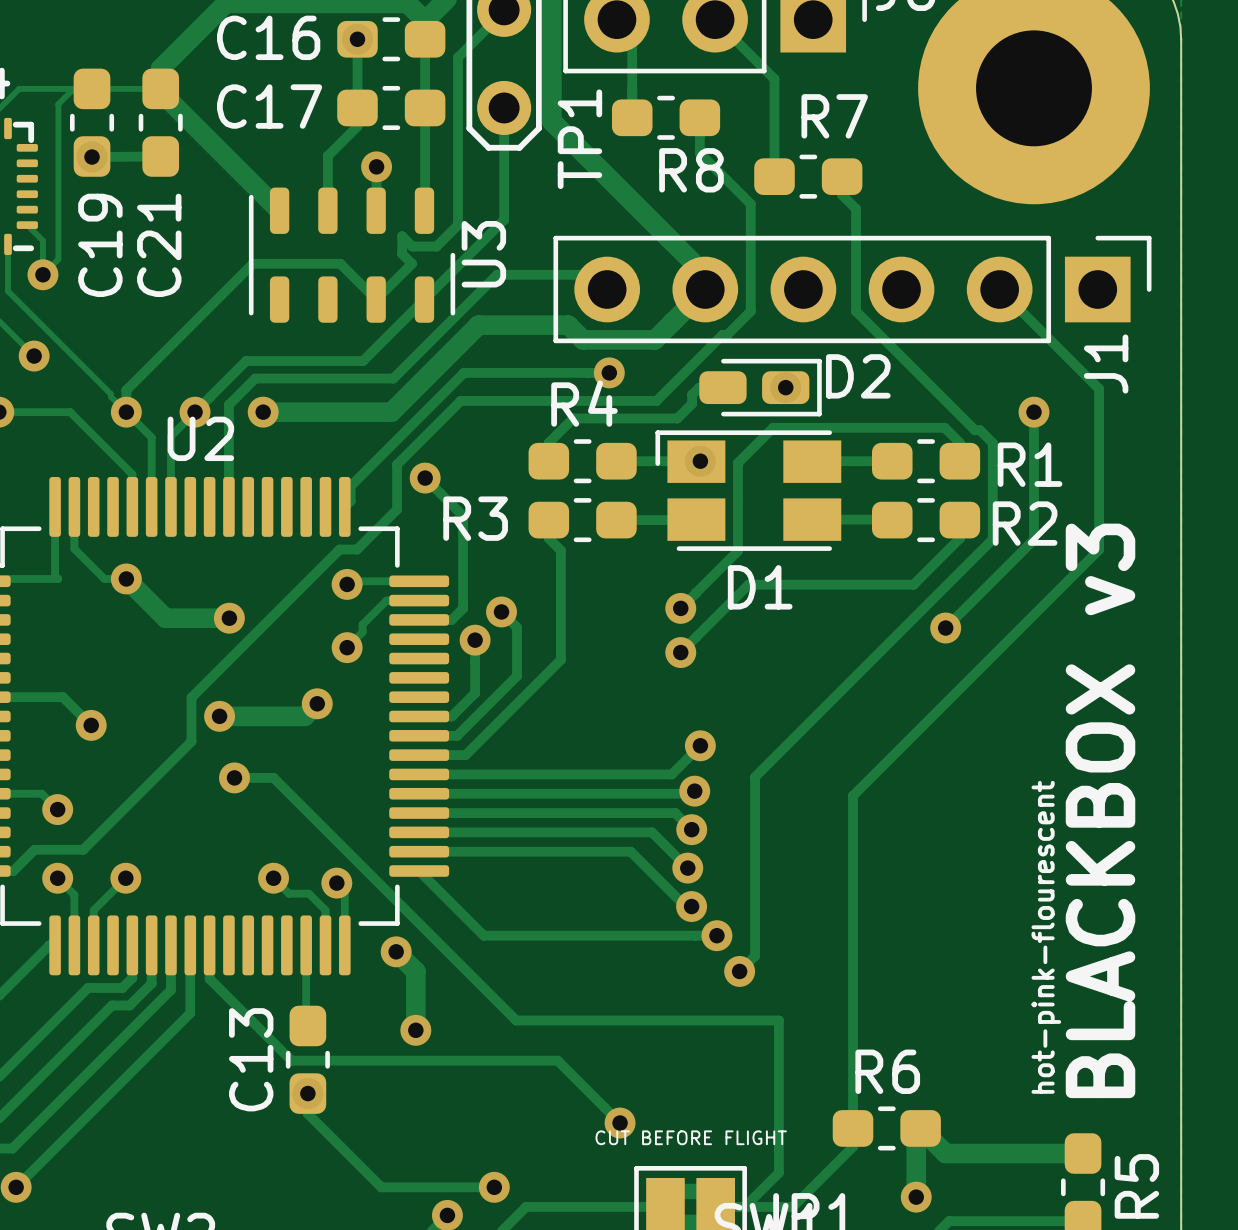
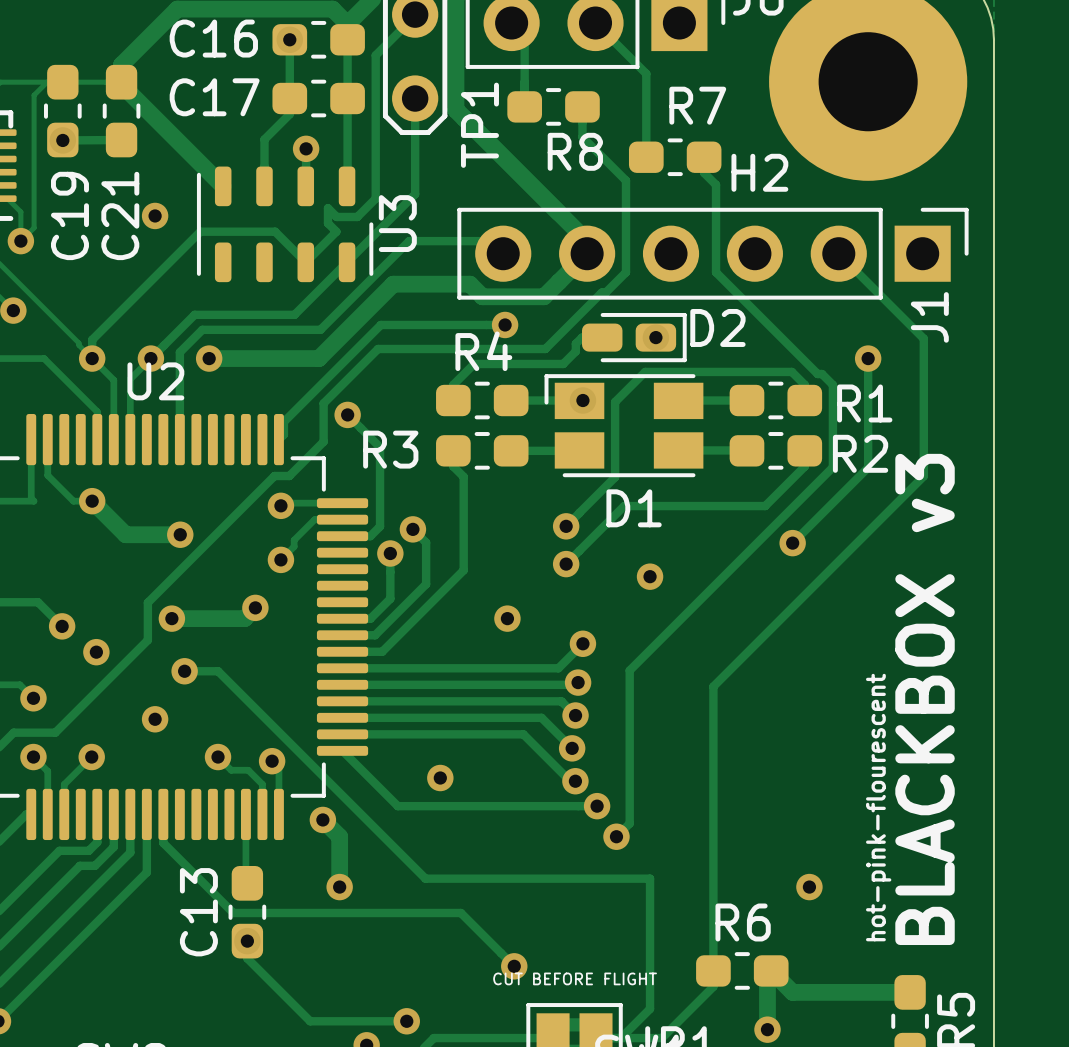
H2 name: none -> H2 (759, 172)
via: none -> (155, 215)
via: none -> (650, 576)
via: none -> (507, 618)
via: none -> (96, 652)
via: none -> (155, 719)
via: none -> (440, 778)
via: none -> (809, 887)

